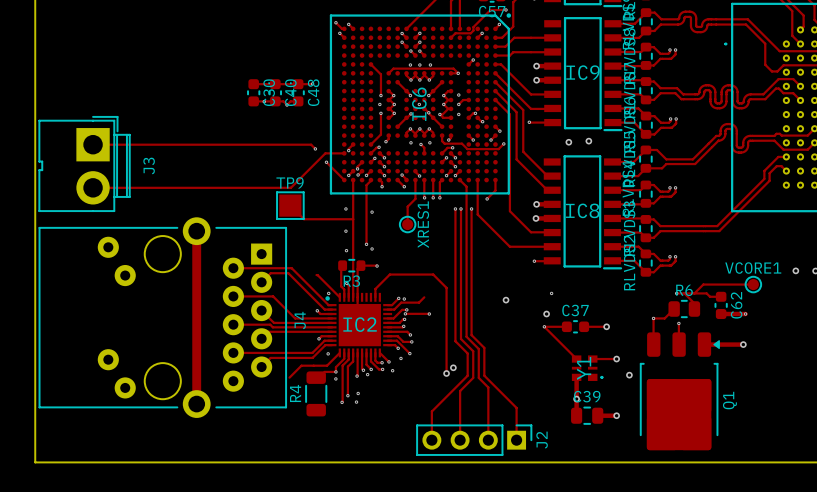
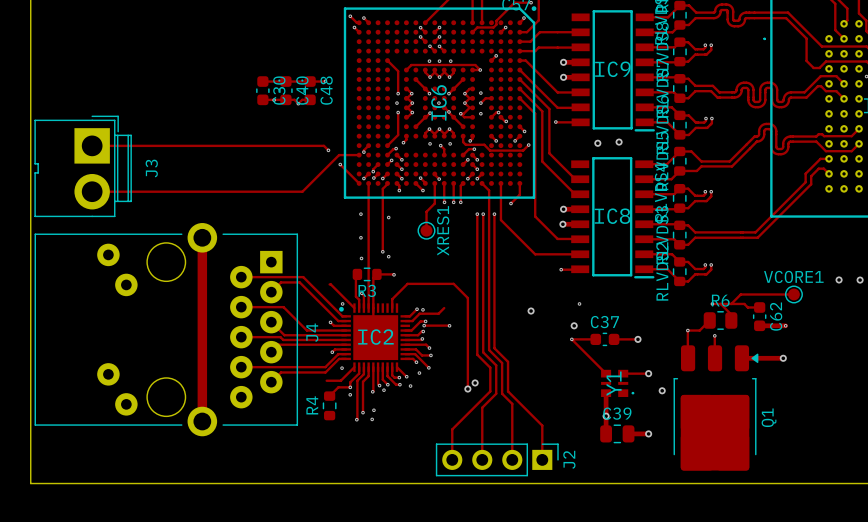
track: (290, 205) (303, 219) (353, 219) -> none
TP9: (290, 205) -> none
track: (313, 365) (301, 365) (289, 377) -> none
R4 footprint: [305, 371, 327, 417] -> [322, 391, 337, 421]

